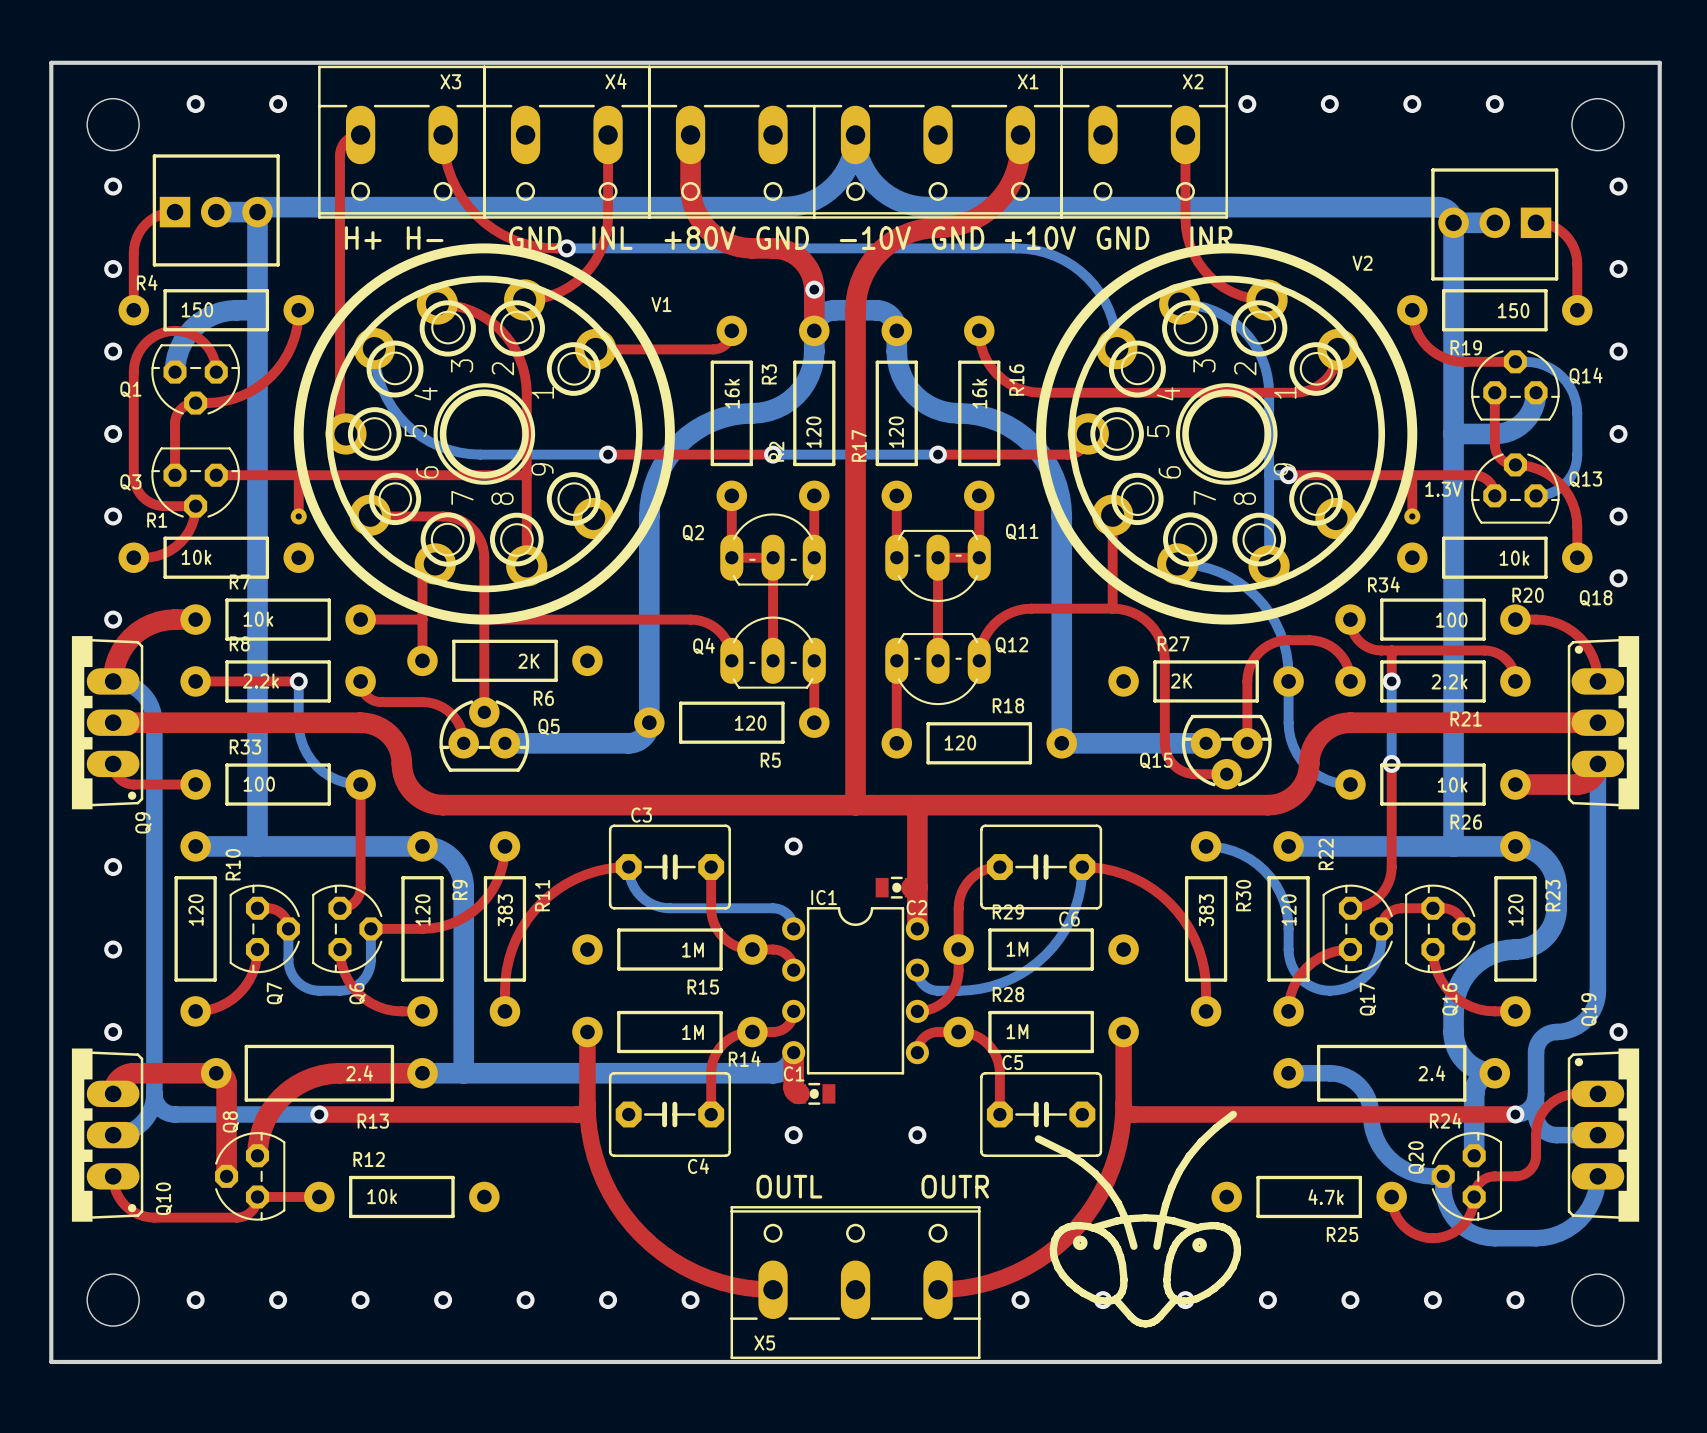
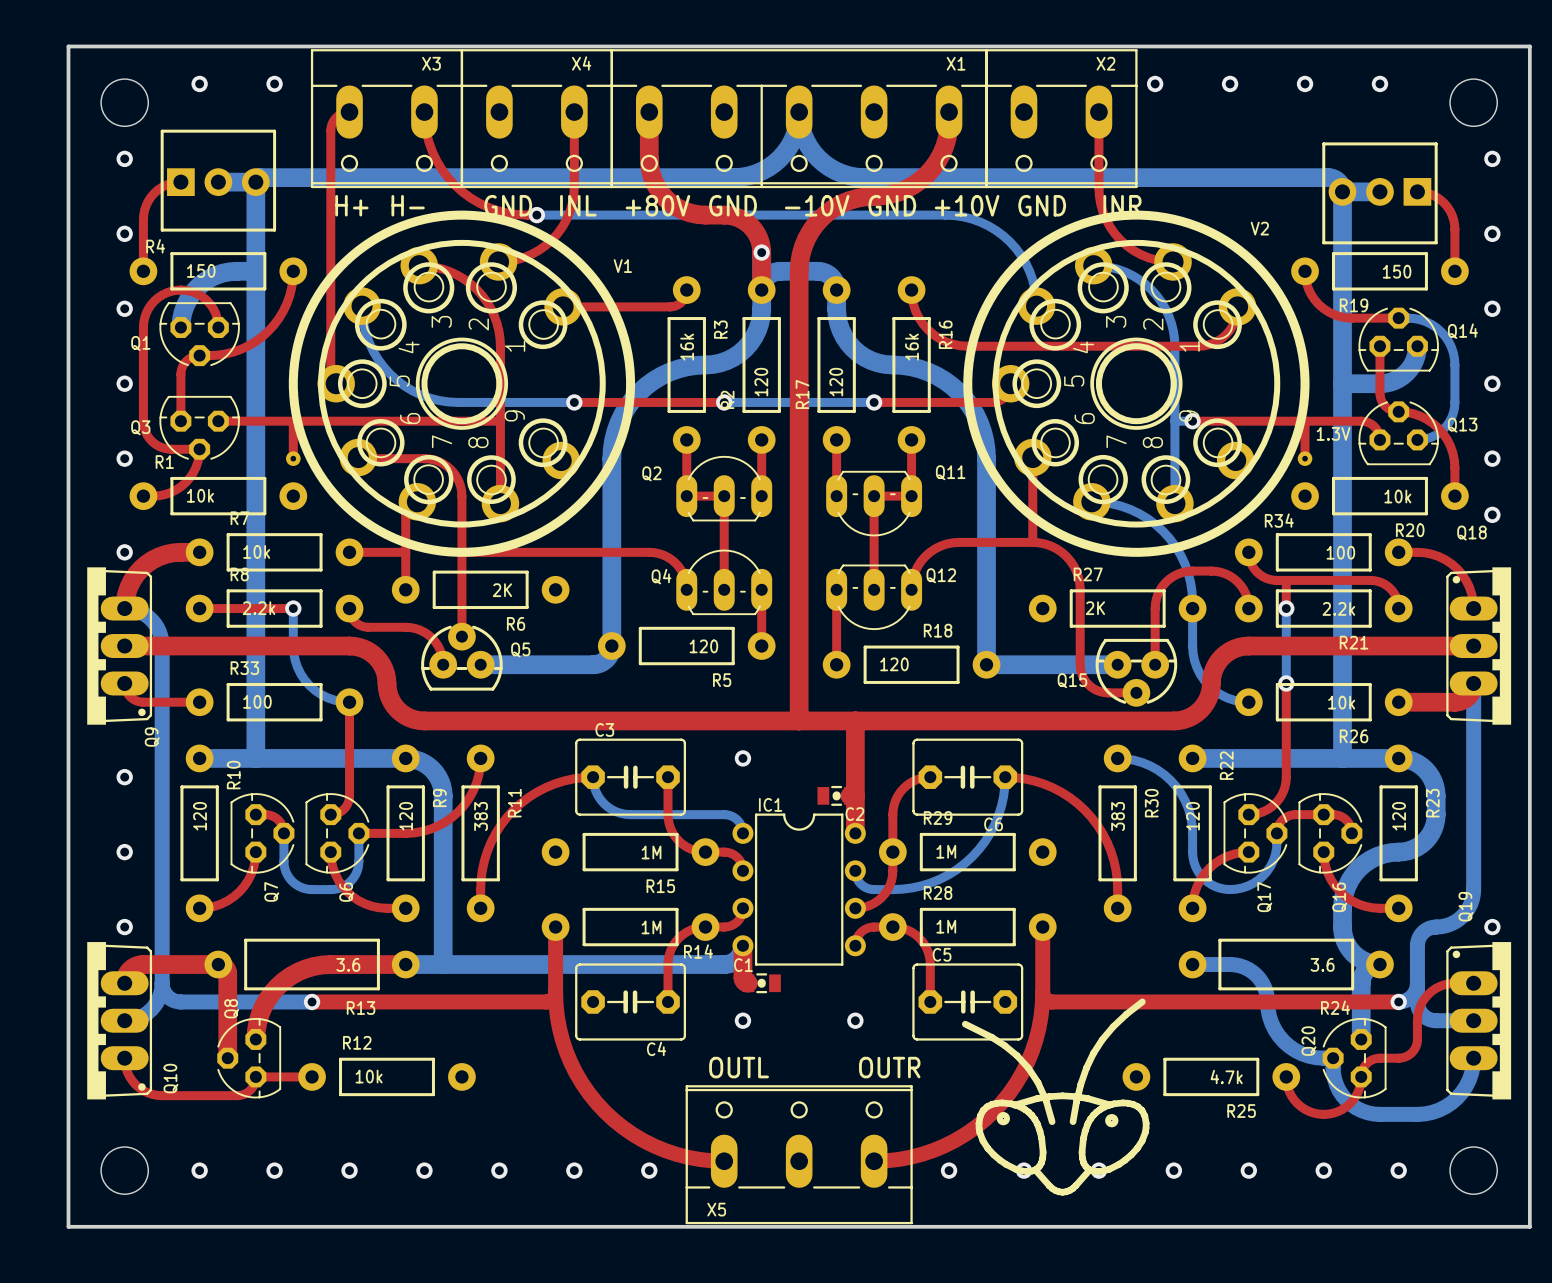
R13 value: 2.4 (359, 1073) -> 3.6 (348, 964)
R24 value: 2.4 (1431, 1073) -> 3.6 (1322, 964)

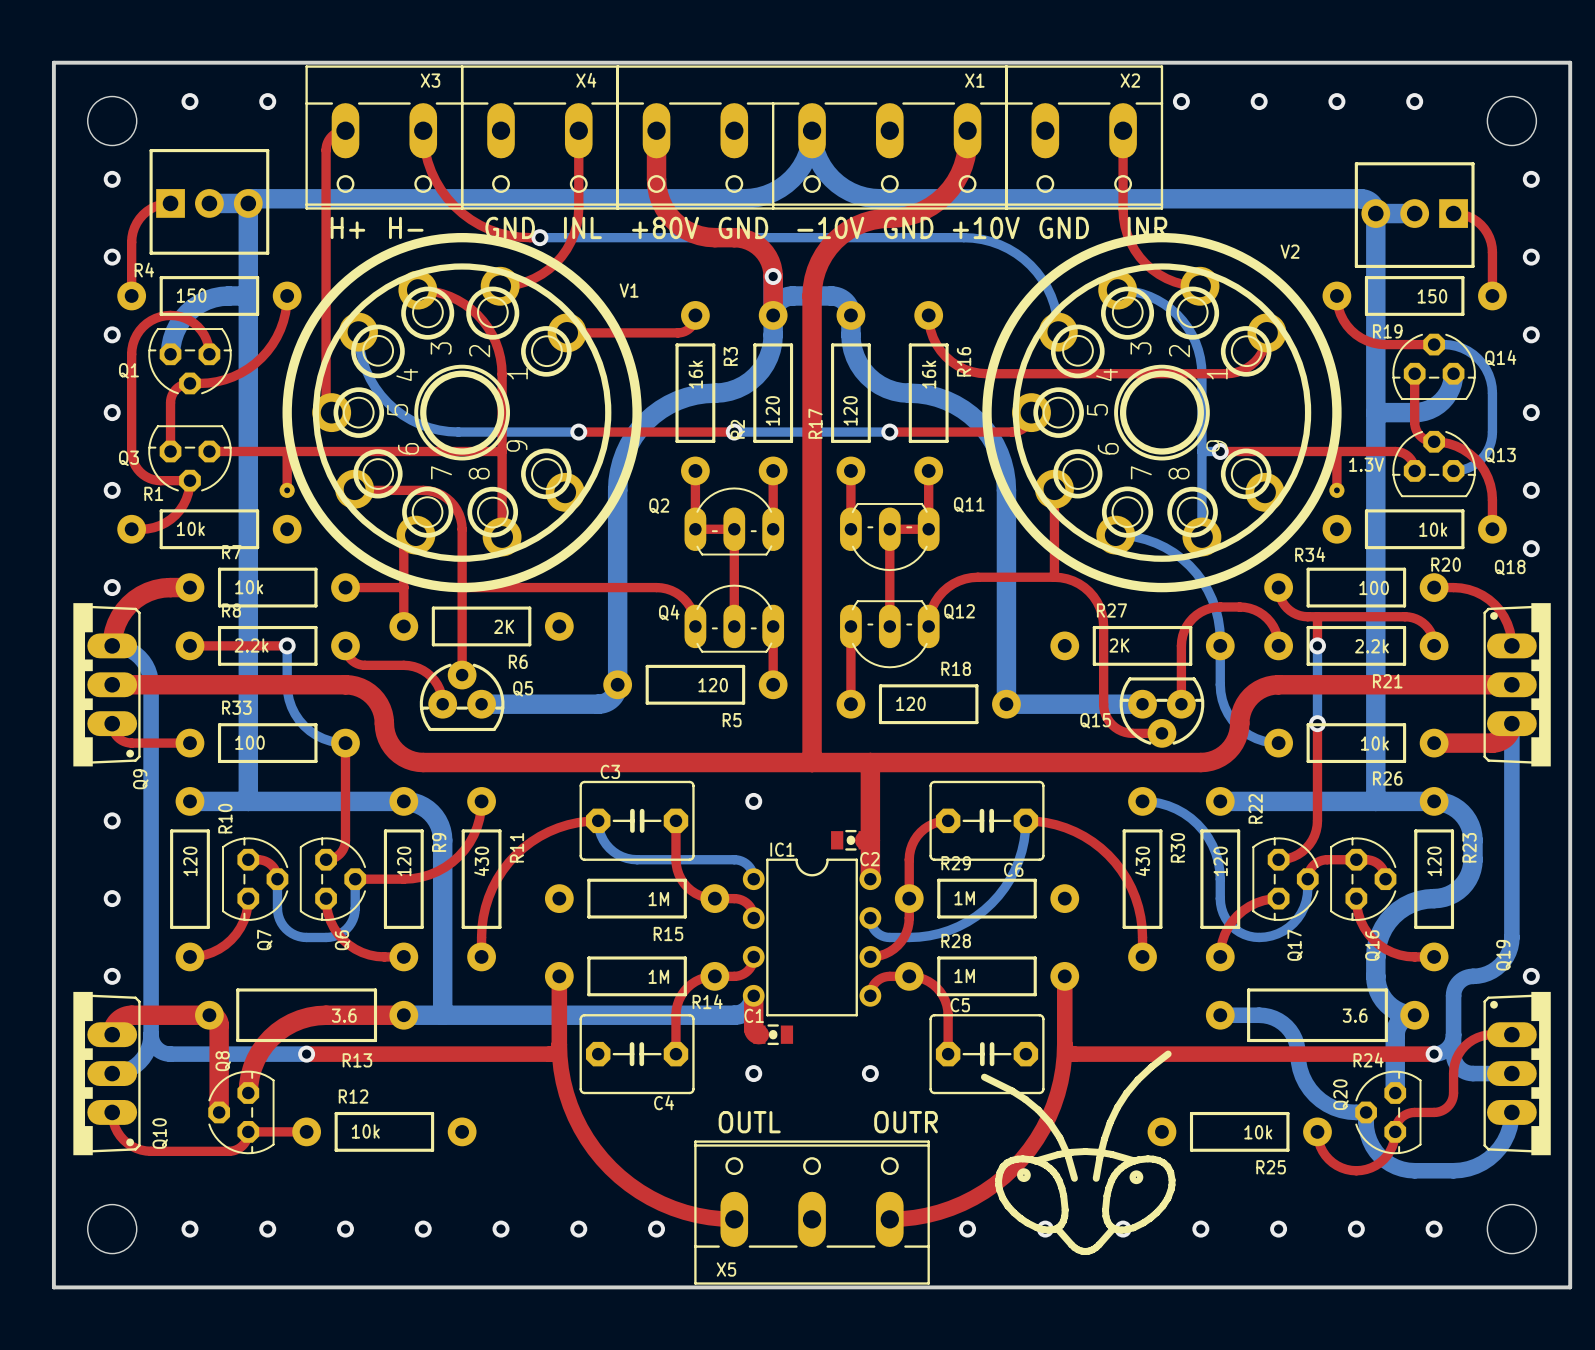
R11 value: 383 (481, 816) -> 430 (481, 861)
R30 value: 383 (1118, 816) -> 430 (1142, 861)
R25 value: 4.7k (1226, 1077) -> 10k (1258, 1132)

